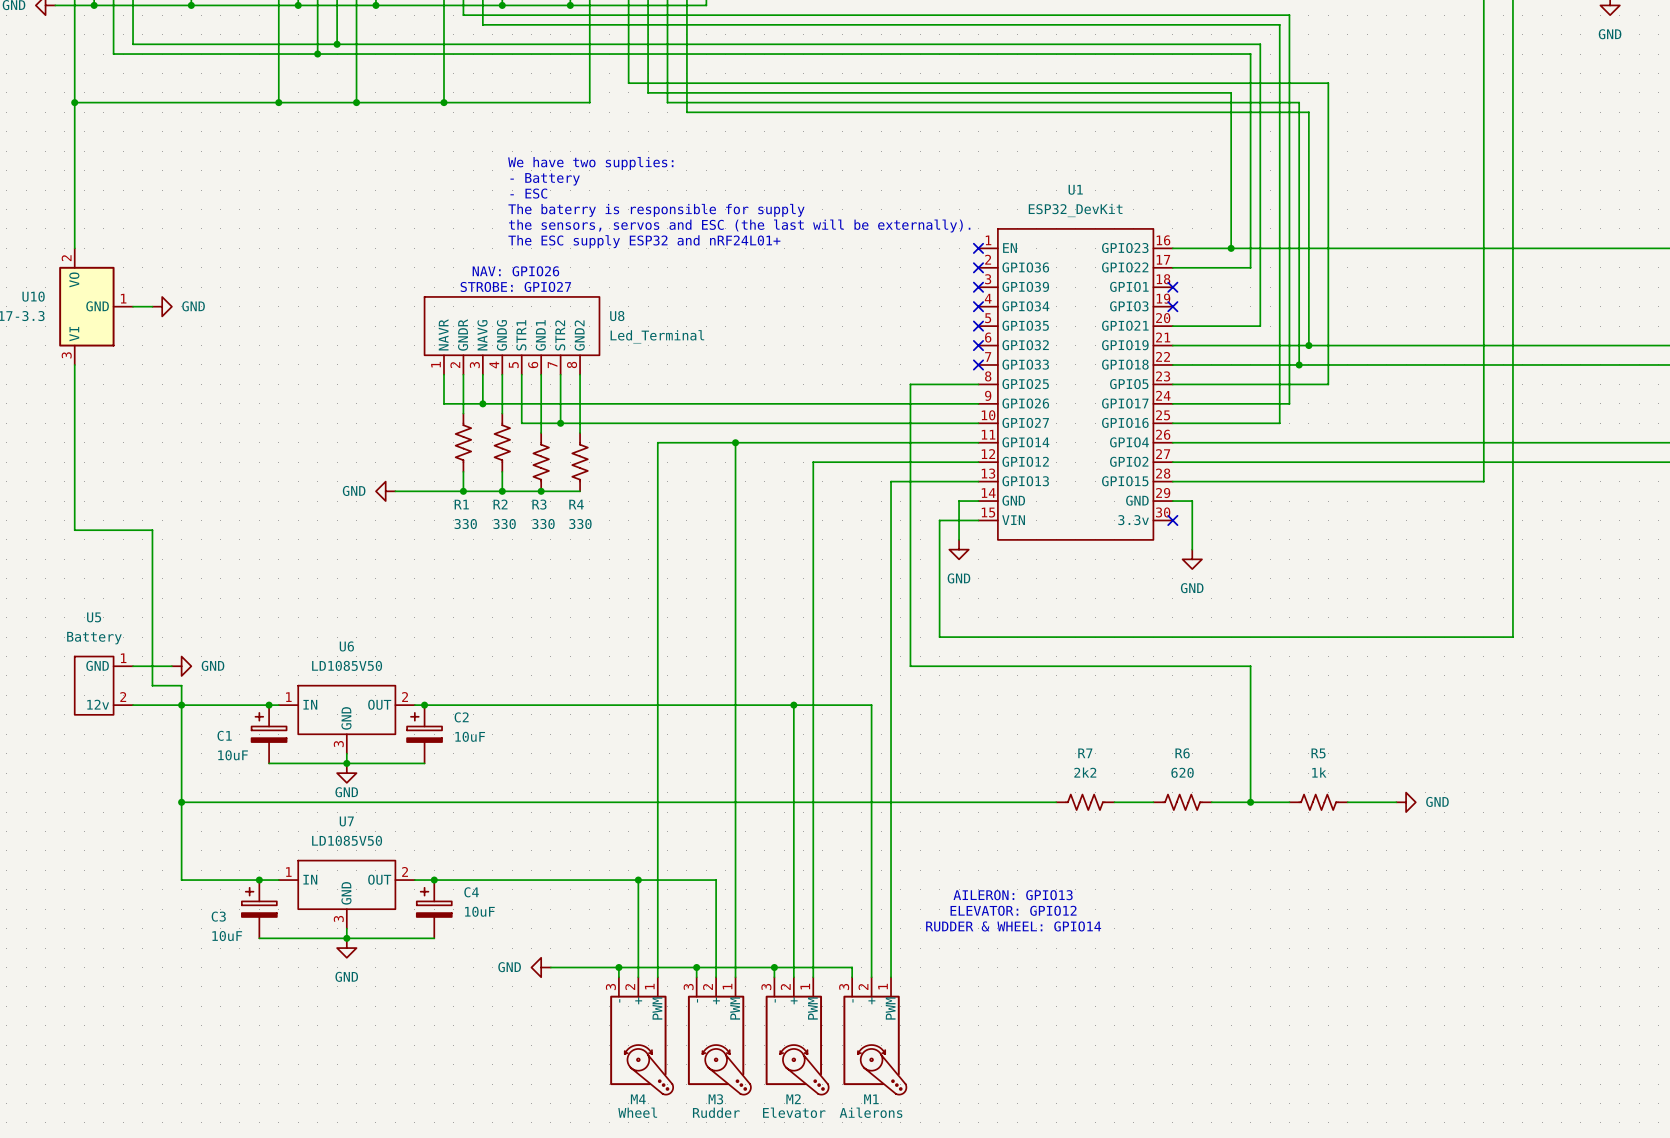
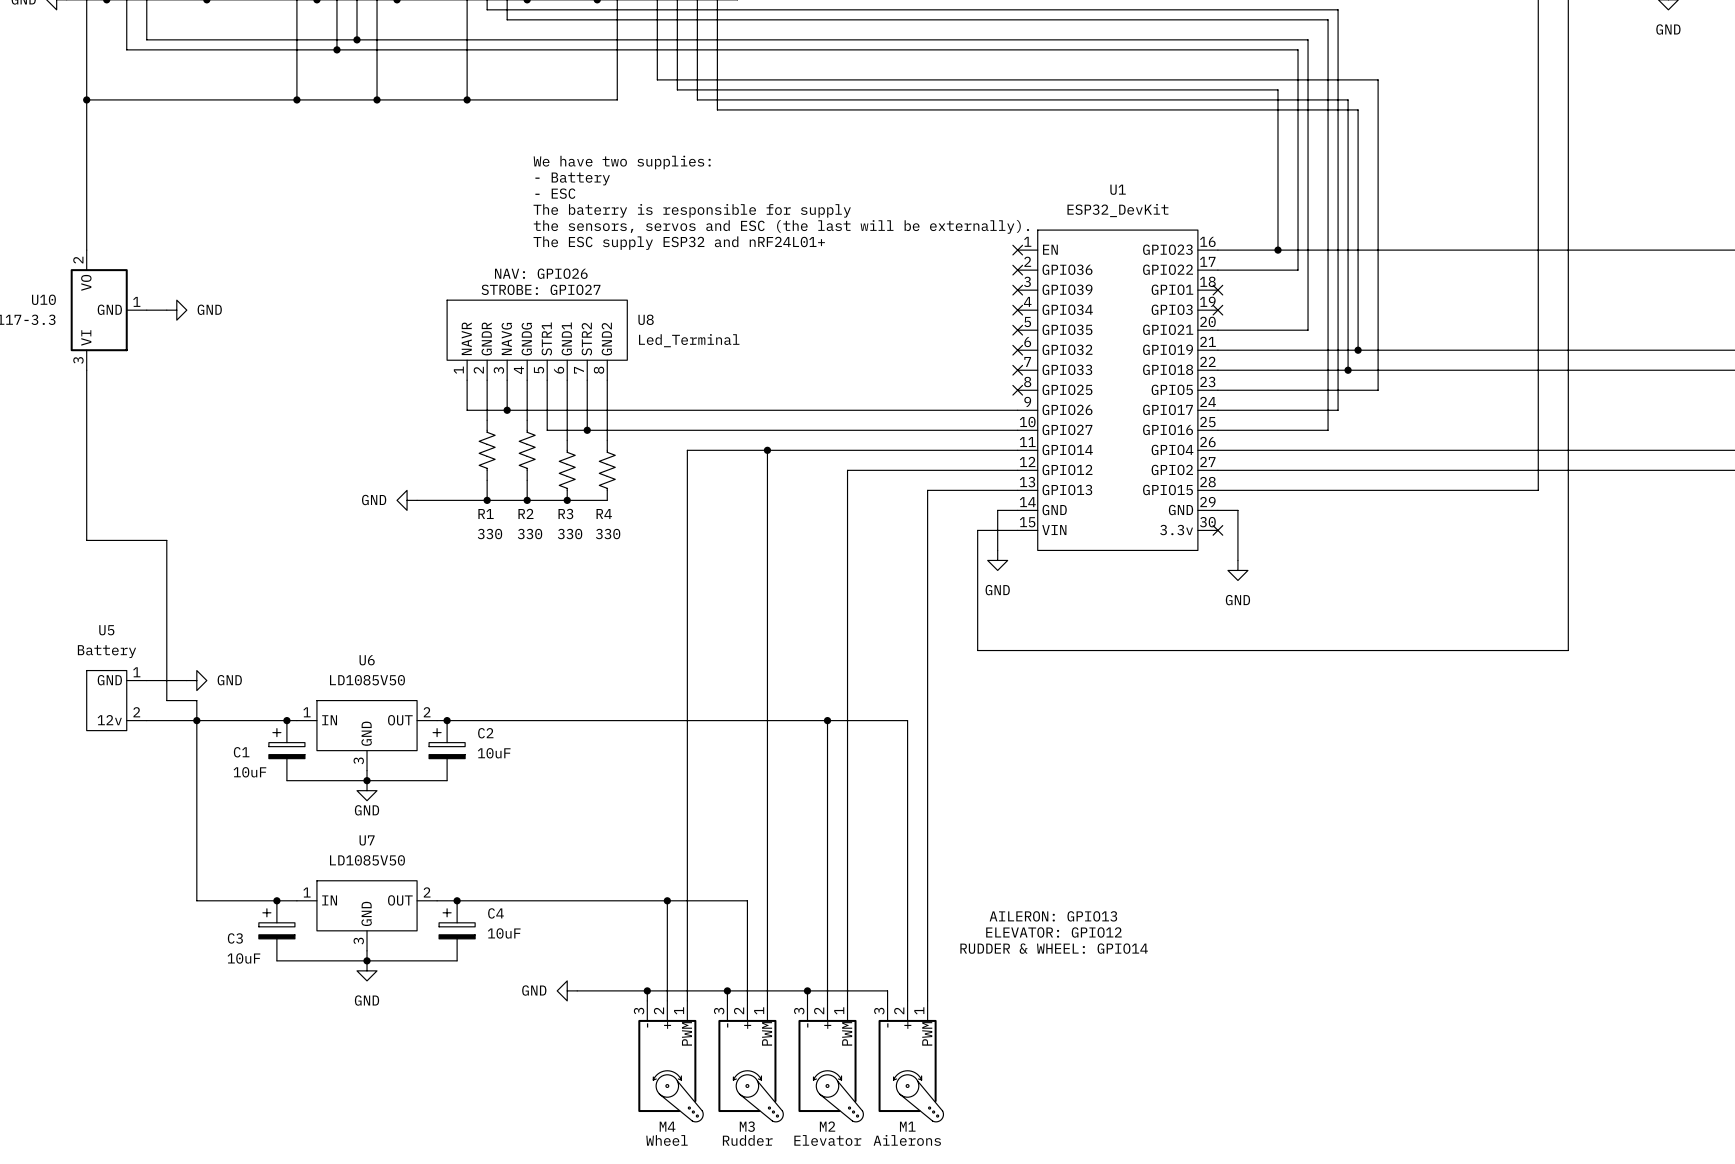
wire: (978, 384) (910, 384) (910, 666) (1250, 666) (1250, 802) -> none
no-connect mark: none -> (1017, 390)
wire: (181, 802) (1056, 802) -> none
junction: (181, 802) -> none
R7: 2k2 (1085, 802) -> none
wire: (1114, 802) (1153, 802) -> none
R6: 620 (1182, 802) -> none
wire: (1211, 802) (1289, 802) -> none
junction: (1250, 802) -> none
R5: 1k (1318, 802) -> none
wire: (1347, 802) (1396, 802) -> none
power symbol: GND (1406, 802) -> none

